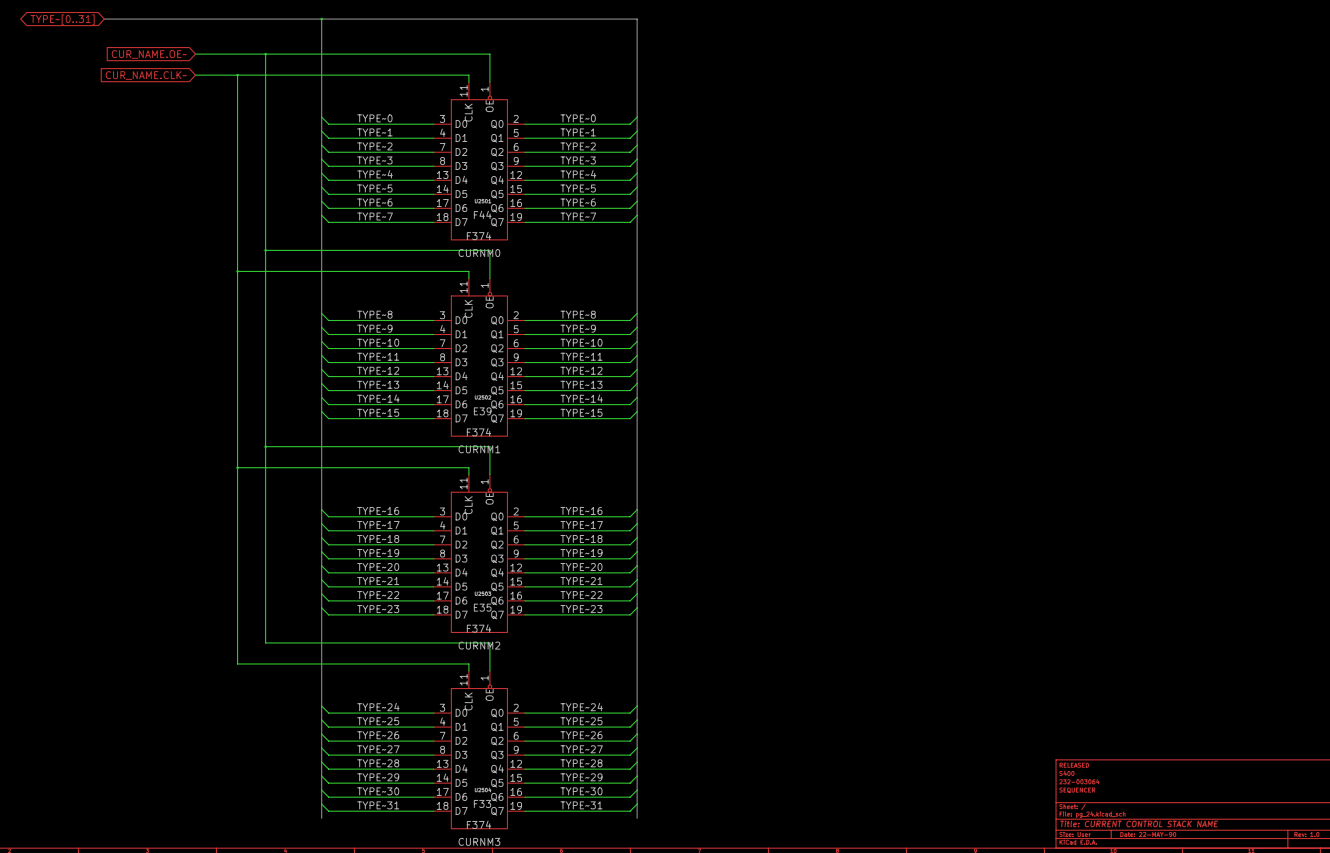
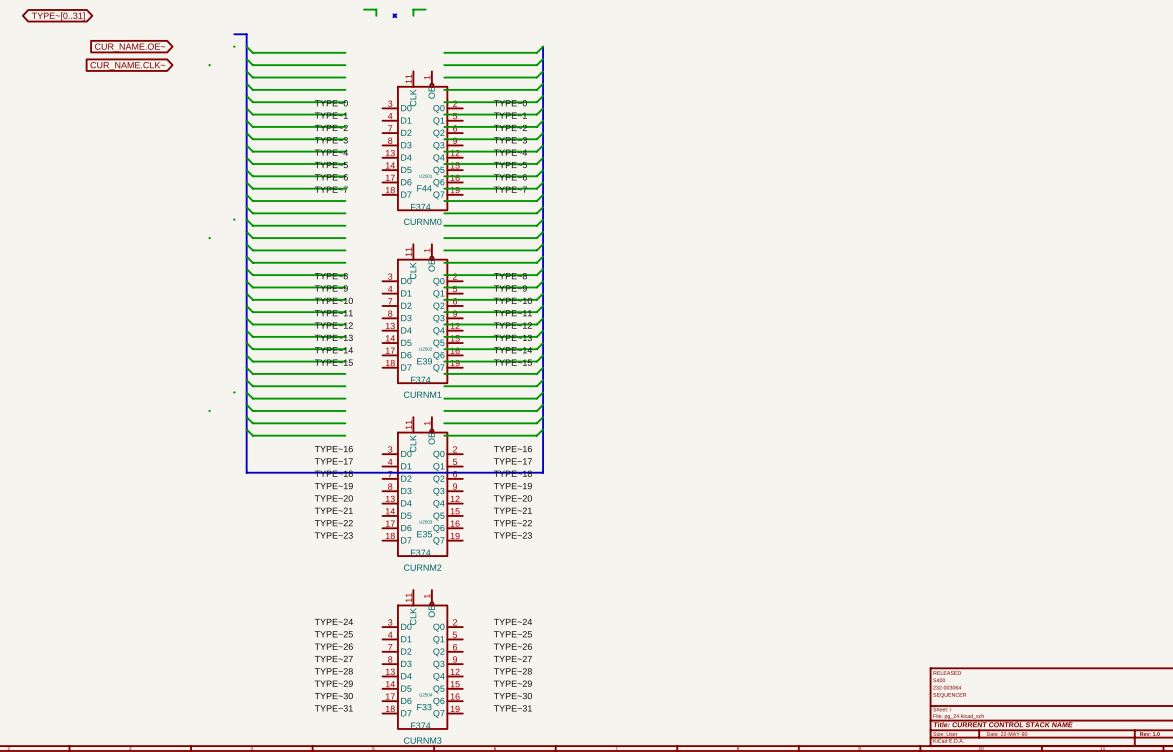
wire: none -> (363, 9) (376, 9) (376, 15)
wire: none -> (425, 9) (413, 9) (413, 15)
bus: (104, 19) (637, 19) (637, 818) -> none
bus: (321, 19) (321, 818) -> none
junction: (321, 19) -> none
no-connect mark: none -> (394, 15)
bus: none -> (234, 34) (246, 34) (246, 472) (543, 472) (543, 46)
wire: (195, 54) (489, 54) (489, 82) -> none
wire: (265, 54) (265, 642) (489, 642) (489, 671) -> none
wire: none -> (246, 46) (252, 52) (345, 52)
wire: (195, 75) (286, 75) -> (246, 58) (252, 65)
wire: (237, 75) (237, 663) (468, 663) (468, 671) -> none
wire: (391, 75) (468, 75) (468, 82) -> none
wire: (321, 117) (328, 124) (433, 124) -> (246, 71) (252, 77) (345, 77)
wire: (637, 117) (630, 124) (524, 124) -> (543, 46) (536, 52) (444, 52)
wire: (321, 131) (328, 138) (433, 138) -> (246, 83) (252, 89) (345, 89)
wire: (637, 131) (630, 138) (524, 138) -> (543, 58) (536, 65) (444, 65)
wire: (321, 145) (328, 152) (433, 152) -> (246, 96) (252, 102) (345, 102)
wire: (637, 145) (630, 152) (524, 152) -> (543, 71) (536, 77) (444, 77)
wire: (321, 159) (328, 166) (433, 166) -> (246, 108) (252, 114) (345, 114)
wire: (637, 159) (630, 166) (524, 166) -> (543, 83) (536, 89) (444, 89)
wire: none -> (543, 145) (536, 151) (444, 151)
wire: (321, 173) (328, 180) (433, 180) -> (246, 120) (252, 126) (345, 126)
wire: (637, 173) (630, 180) (524, 180) -> (543, 96) (536, 102) (444, 102)
wire: none -> (543, 157) (536, 163) (444, 163)
wire: (321, 187) (328, 194) (433, 194) -> (246, 133) (252, 139) (345, 139)
wire: (637, 187) (630, 194) (524, 194) -> (543, 108) (536, 114) (444, 114)
wire: none -> (246, 170) (252, 176) (345, 176)
wire: none -> (543, 170) (536, 176) (444, 176)
wire: (321, 201) (328, 208) (433, 208) -> (246, 145) (252, 151) (345, 151)
wire: (637, 201) (630, 208) (524, 208) -> (543, 120) (536, 126) (444, 126)
wire: none -> (246, 182) (252, 188) (345, 188)
wire: none -> (543, 182) (536, 188) (444, 188)
wire: (321, 215) (328, 222) (433, 222) -> (246, 157) (252, 163) (345, 163)
wire: (637, 215) (630, 222) (524, 222) -> (543, 133) (536, 139) (444, 139)
wire: none -> (246, 194) (252, 201) (345, 201)
wire: none -> (543, 194) (536, 201) (444, 201)
wire: none -> (246, 207) (252, 213) (345, 213)
wire: none -> (543, 207) (536, 213) (444, 213)
wire: (265, 250) (489, 250) (489, 278) -> none
wire: none -> (246, 219) (252, 225) (345, 225)
wire: (237, 271) (286, 271) -> (246, 231) (252, 238)
wire: (391, 271) (468, 271) (468, 278) -> none
wire: (321, 313) (328, 320) (433, 320) -> (246, 244) (252, 250) (345, 250)
wire: (637, 313) (630, 320) (524, 320) -> (543, 219) (536, 225) (444, 225)
wire: (321, 327) (328, 334) (433, 334) -> (246, 256) (252, 262) (345, 262)
wire: (637, 327) (630, 334) (524, 334) -> (543, 231) (536, 238) (444, 238)
wire: (321, 341) (328, 348) (433, 348) -> (246, 268) (252, 275) (345, 275)
wire: (637, 341) (630, 348) (524, 348) -> (543, 244) (536, 250) (444, 250)
wire: (321, 355) (328, 362) (433, 362) -> (246, 281) (252, 287) (345, 287)
wire: (637, 355) (630, 362) (524, 362) -> (543, 256) (536, 262) (444, 262)
wire: none -> (543, 318) (536, 324) (444, 324)
wire: (321, 369) (328, 376) (433, 376) -> (246, 293) (252, 299) (345, 299)
wire: (637, 369) (630, 376) (524, 376) -> (543, 268) (536, 275) (444, 275)
wire: none -> (543, 330) (536, 336) (444, 336)
wire: (321, 383) (328, 390) (433, 390) -> (246, 305) (252, 312) (345, 312)
wire: (637, 383) (630, 390) (524, 390) -> (543, 281) (536, 287) (444, 287)
wire: none -> (246, 343) (252, 349) (345, 349)
wire: none -> (543, 343) (536, 349) (444, 349)
wire: (321, 397) (328, 404) (433, 404) -> (246, 318) (252, 324) (345, 324)
wire: (637, 397) (630, 404) (524, 404) -> (543, 293) (536, 299) (444, 299)
wire: none -> (246, 355) (252, 361) (345, 361)
wire: none -> (543, 355) (536, 361) (444, 361)
wire: (321, 411) (328, 418) (433, 418) -> (246, 330) (252, 336) (345, 336)
wire: (637, 411) (630, 418) (524, 418) -> (543, 305) (536, 312) (444, 312)
wire: none -> (246, 367) (252, 373) (345, 373)
wire: none -> (543, 367) (536, 373) (444, 373)
wire: none -> (246, 380) (252, 386) (345, 386)
wire: none -> (543, 380) (536, 386) (444, 386)
wire: (265, 446) (489, 446) (489, 474) -> none
wire: none -> (246, 392) (252, 398) (345, 398)
wire: (237, 467) (286, 467) -> (246, 404) (252, 410)
wire: (391, 467) (468, 467) (468, 474) -> none
wire: (321, 509) (328, 516) (433, 516) -> (246, 417) (252, 423) (345, 423)
wire: (637, 509) (630, 516) (524, 516) -> (543, 392) (536, 398) (444, 398)
wire: (321, 523) (328, 530) (433, 530) -> (246, 429) (252, 435) (345, 435)
wire: (637, 523) (630, 530) (524, 530) -> (543, 404) (536, 410) (444, 410)
wire: (321, 537) (328, 544) (433, 544) -> none
wire: (637, 537) (630, 544) (524, 544) -> (543, 417) (536, 423) (444, 423)
wire: (321, 551) (328, 558) (433, 558) -> none
wire: (637, 551) (630, 558) (524, 558) -> (543, 429) (536, 435) (444, 435)
wire: (321, 565) (328, 572) (433, 572) -> none
wire: (637, 565) (630, 572) (524, 572) -> none
wire: (321, 579) (328, 586) (433, 586) -> none
wire: (637, 579) (630, 586) (524, 586) -> none
wire: (321, 593) (328, 600) (433, 600) -> none
wire: (637, 593) (630, 600) (524, 600) -> none
wire: (321, 607) (328, 614) (433, 614) -> none
wire: (637, 607) (630, 614) (524, 614) -> none
wire: (321, 706) (328, 713) (433, 713) -> none
wire: (637, 706) (630, 713) (524, 713) -> none
wire: (321, 720) (328, 727) (433, 727) -> none
wire: (637, 720) (630, 727) (524, 727) -> none
wire: (321, 734) (328, 741) (433, 741) -> none
wire: (637, 734) (630, 741) (524, 741) -> none
wire: (321, 748) (328, 755) (433, 755) -> none
wire: (637, 748) (630, 755) (524, 755) -> none
wire: (321, 762) (328, 769) (433, 769) -> none
wire: (637, 762) (630, 769) (524, 769) -> none
wire: (321, 776) (328, 783) (433, 783) -> none
wire: (637, 776) (630, 783) (524, 783) -> none
wire: (321, 790) (328, 797) (433, 797) -> none
wire: (637, 790) (630, 797) (524, 797) -> none
wire: (321, 804) (328, 811) (433, 811) -> none
wire: (637, 804) (630, 811) (524, 811) -> none

